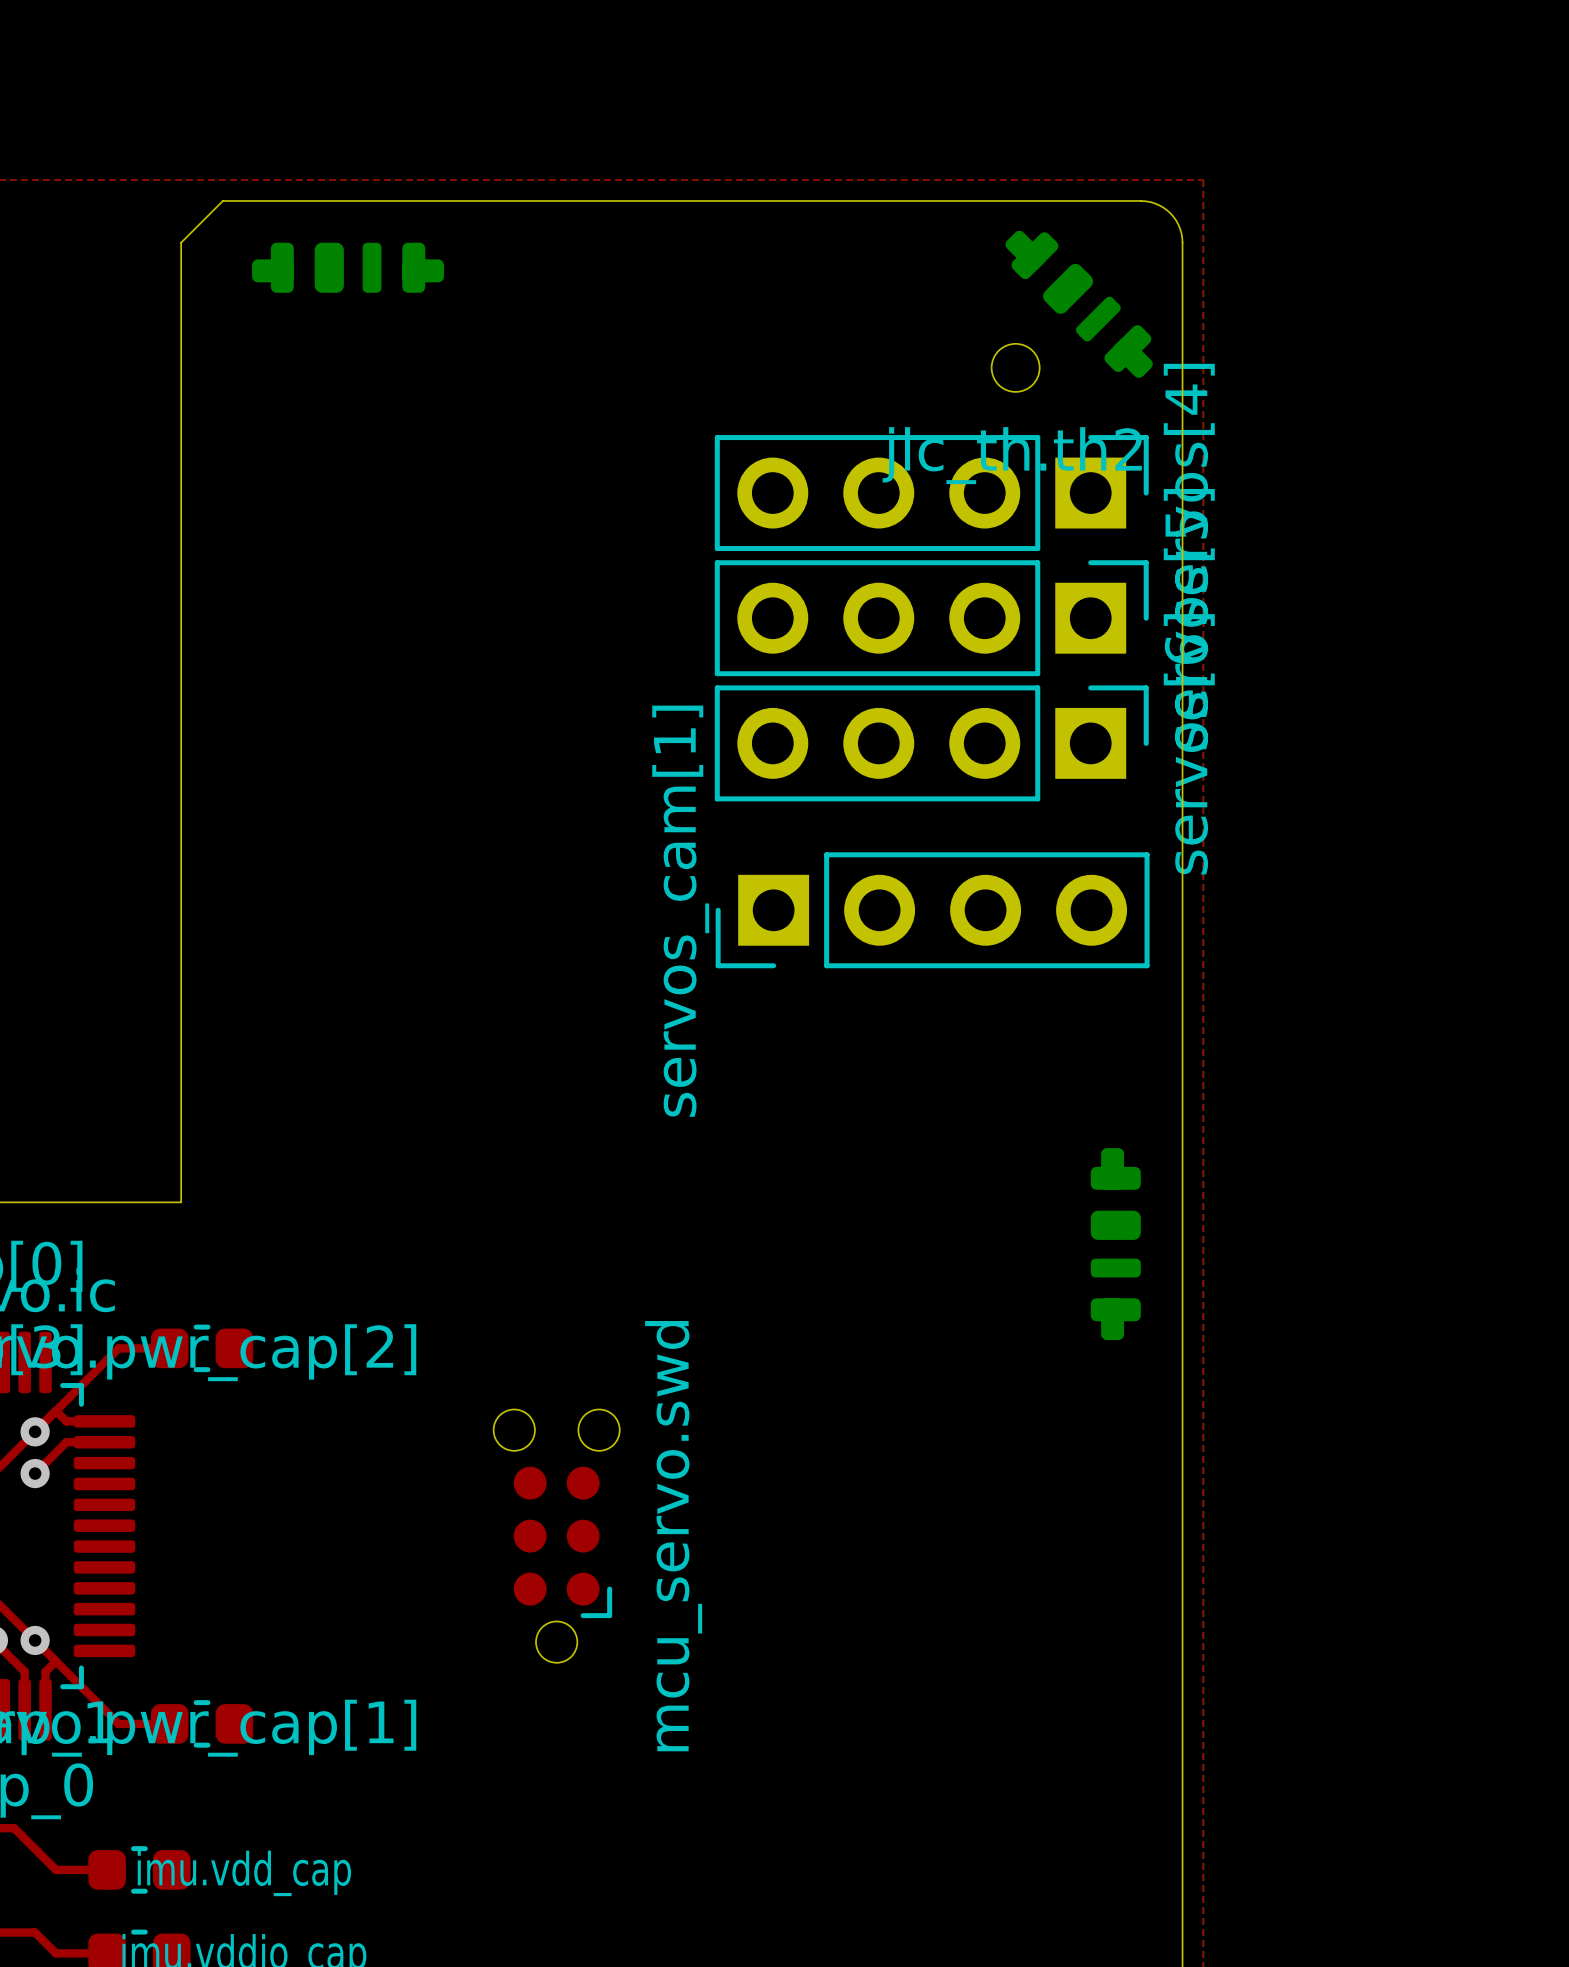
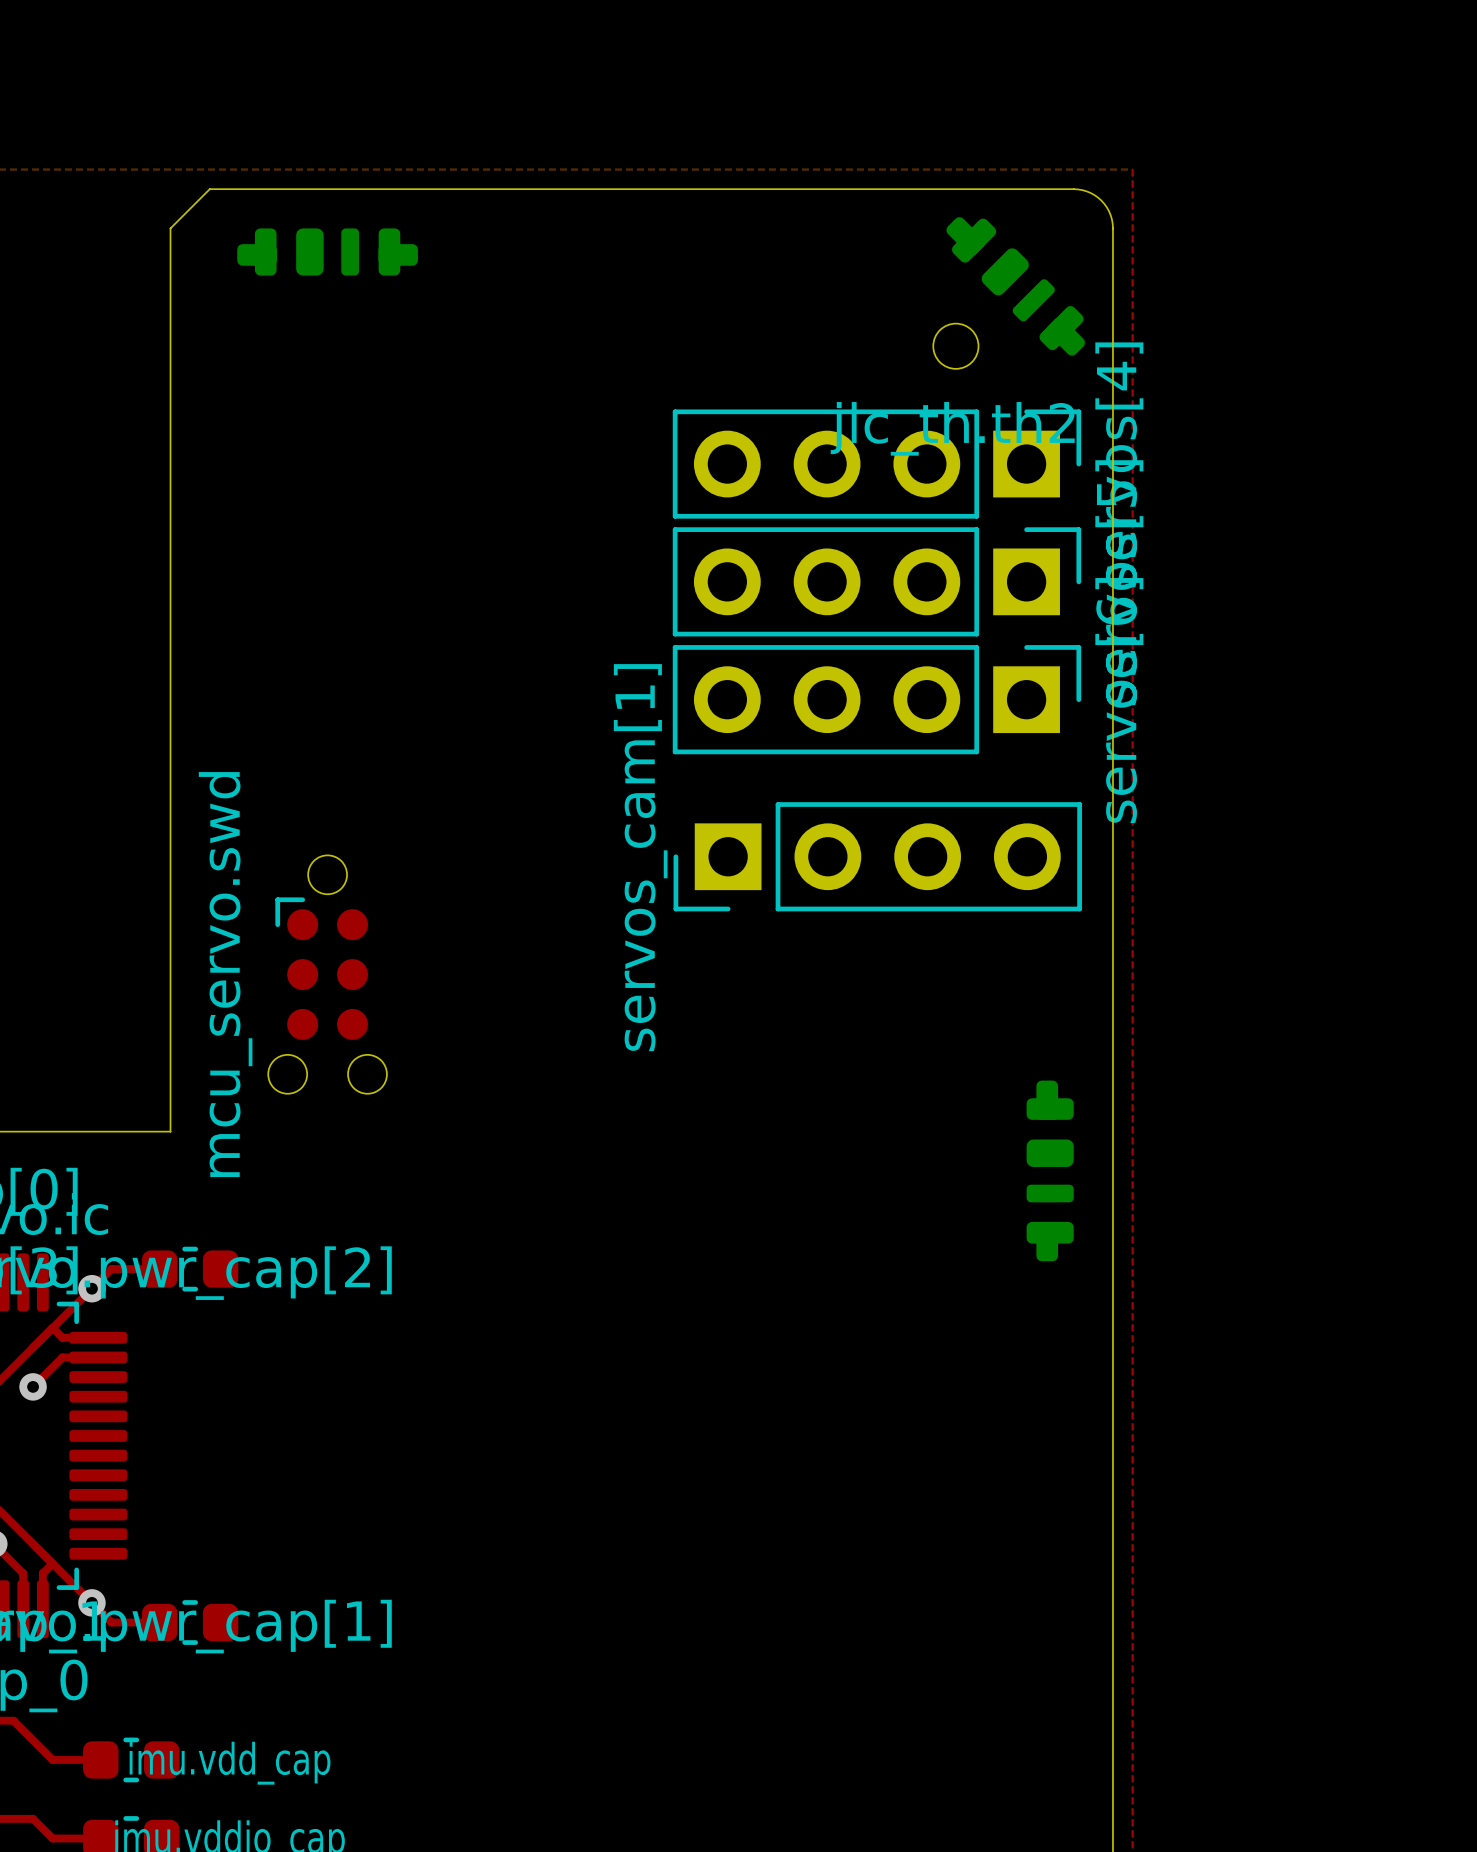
via position: (35, 1431) -> (91, 1288)
mcu_servo.swd rotation: 0° (556, 1536) -> 180° (327, 974)
mcu_servo.swd position: (556, 1536) -> (327, 974)
via position: (35, 1640) -> (91, 1602)

